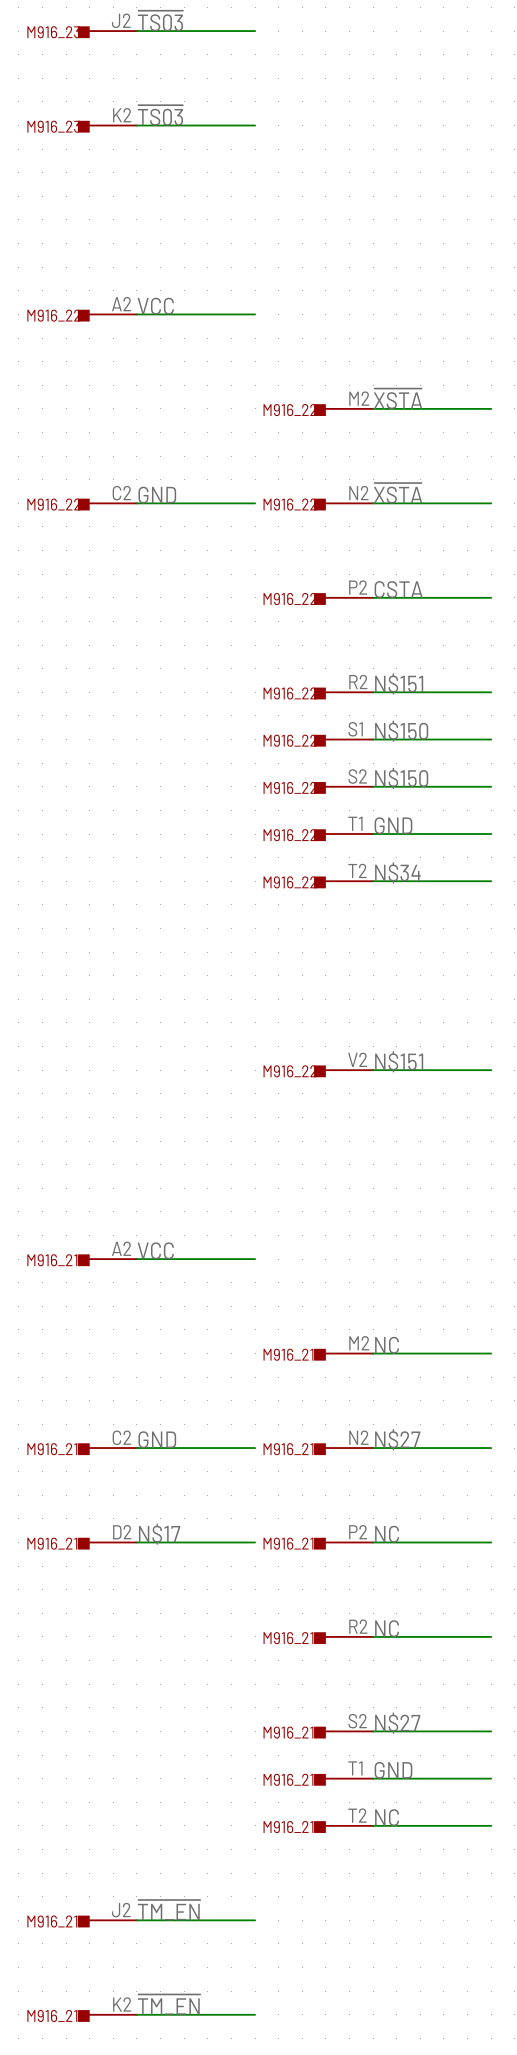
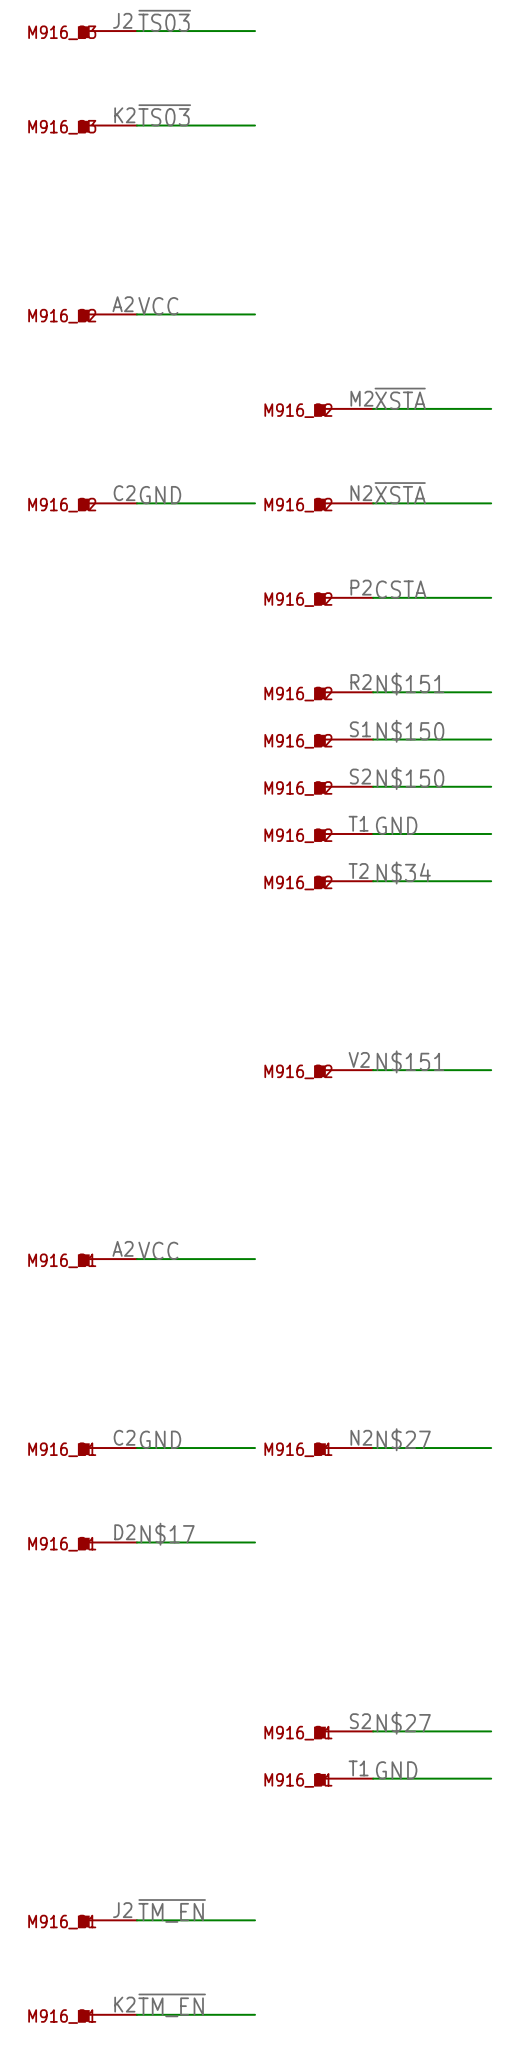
label: NC (387, 1345) -> none
wire: (373, 1353) (491, 1353) -> none
M916_21: (343, 1354) -> none
label: NC (387, 1534) -> none
wire: (373, 1542) (491, 1542) -> none
M916_21: (343, 1543) -> none
label: NC (387, 1628) -> none
wire: (373, 1636) (491, 1636) -> none
M916_21: (343, 1638) -> none
label: NC (387, 1817) -> none
wire: (373, 1825) (491, 1825) -> none
M916_21: (343, 1827) -> none

